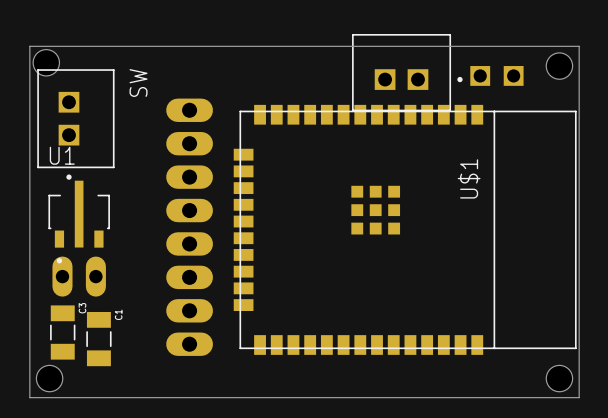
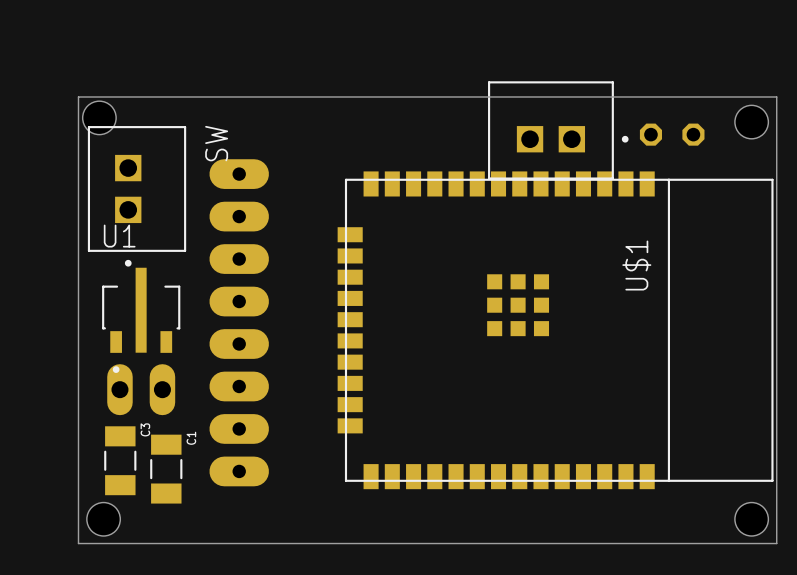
part footprint: [470, 66, 524, 86] -> [639, 123, 705, 146]
part: none -> (239, 322)
part: (189, 227) -> none

